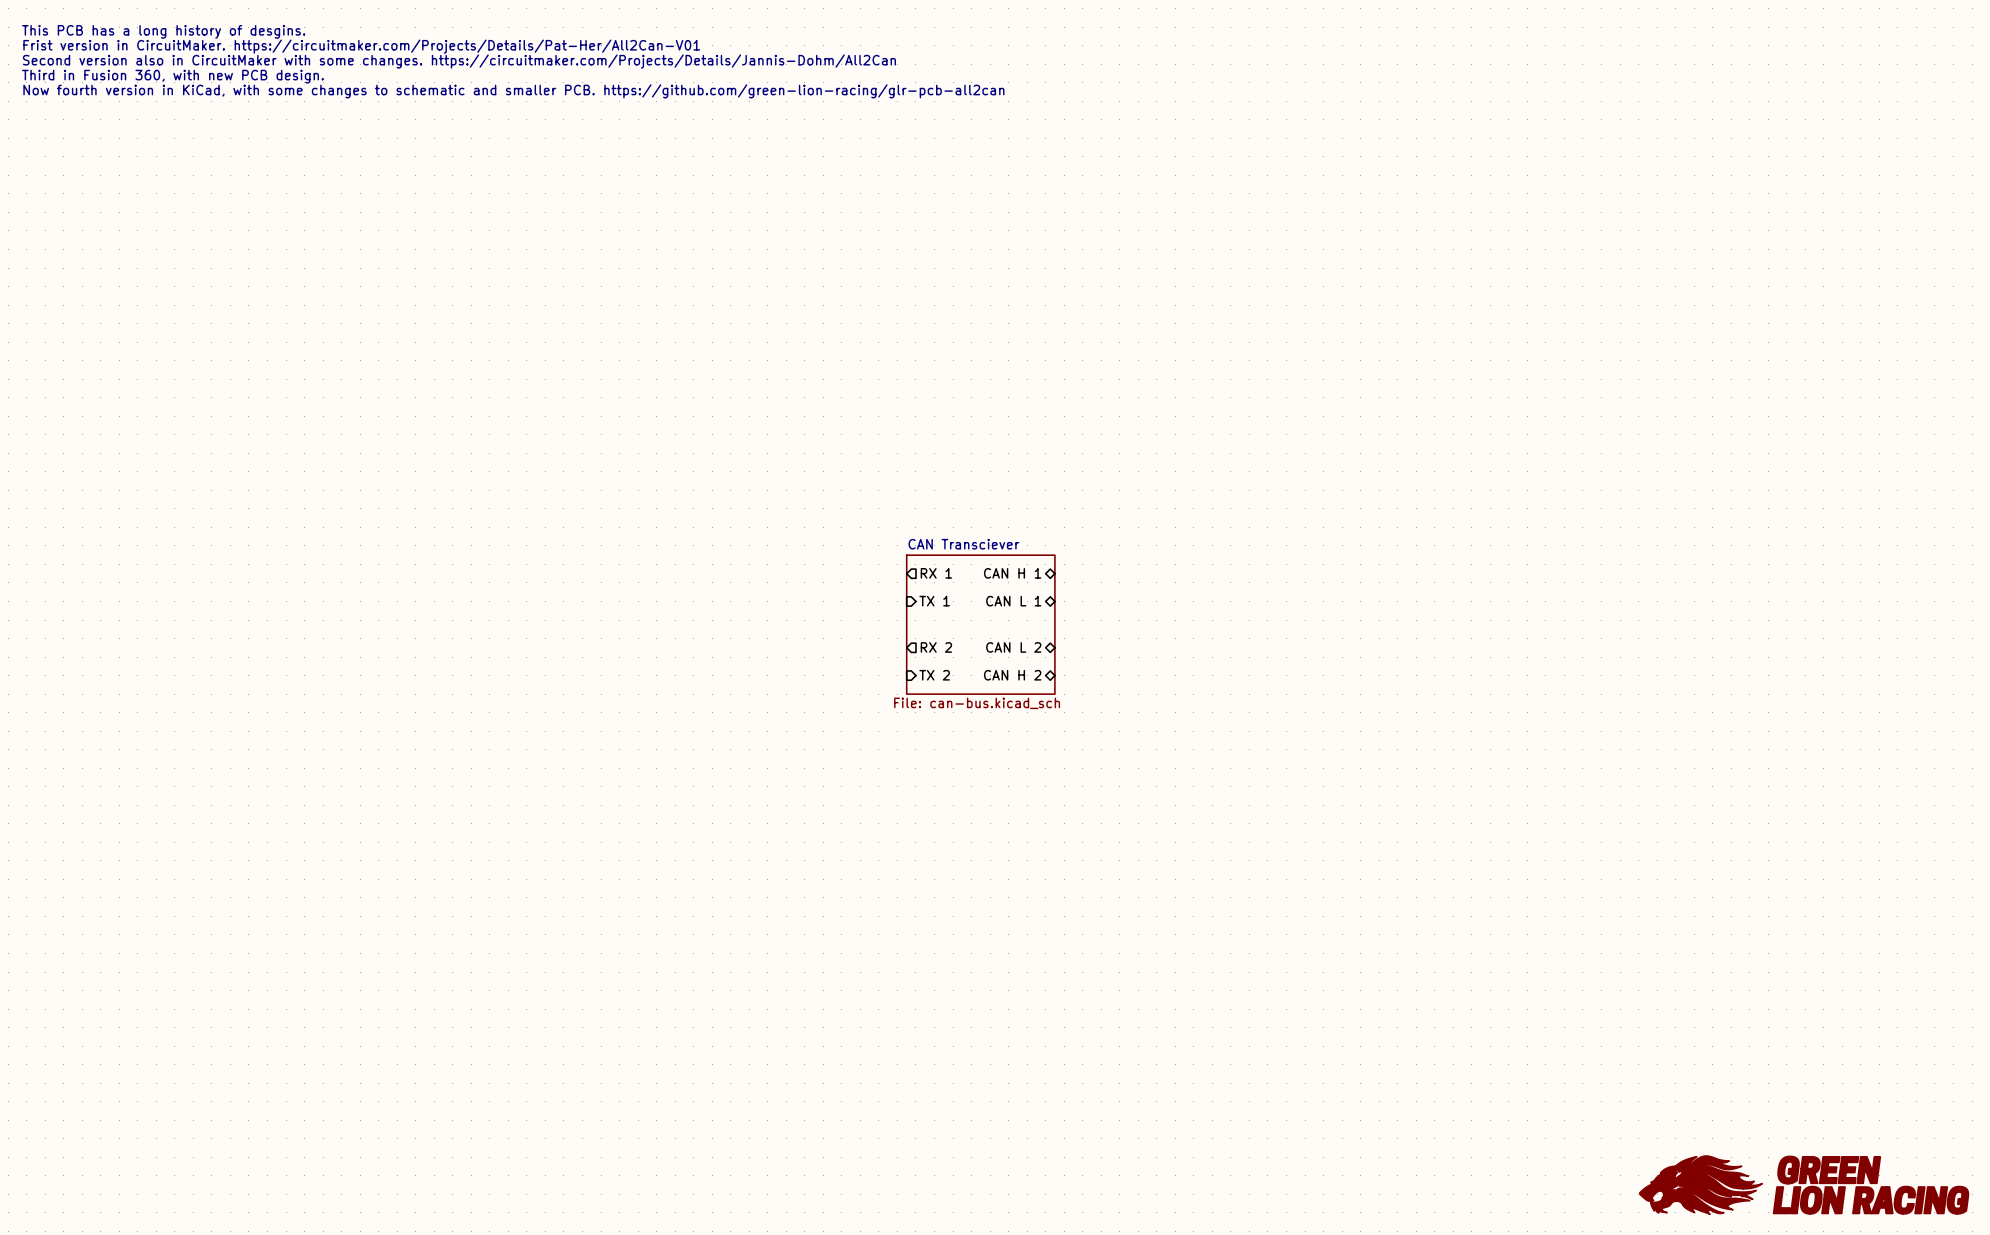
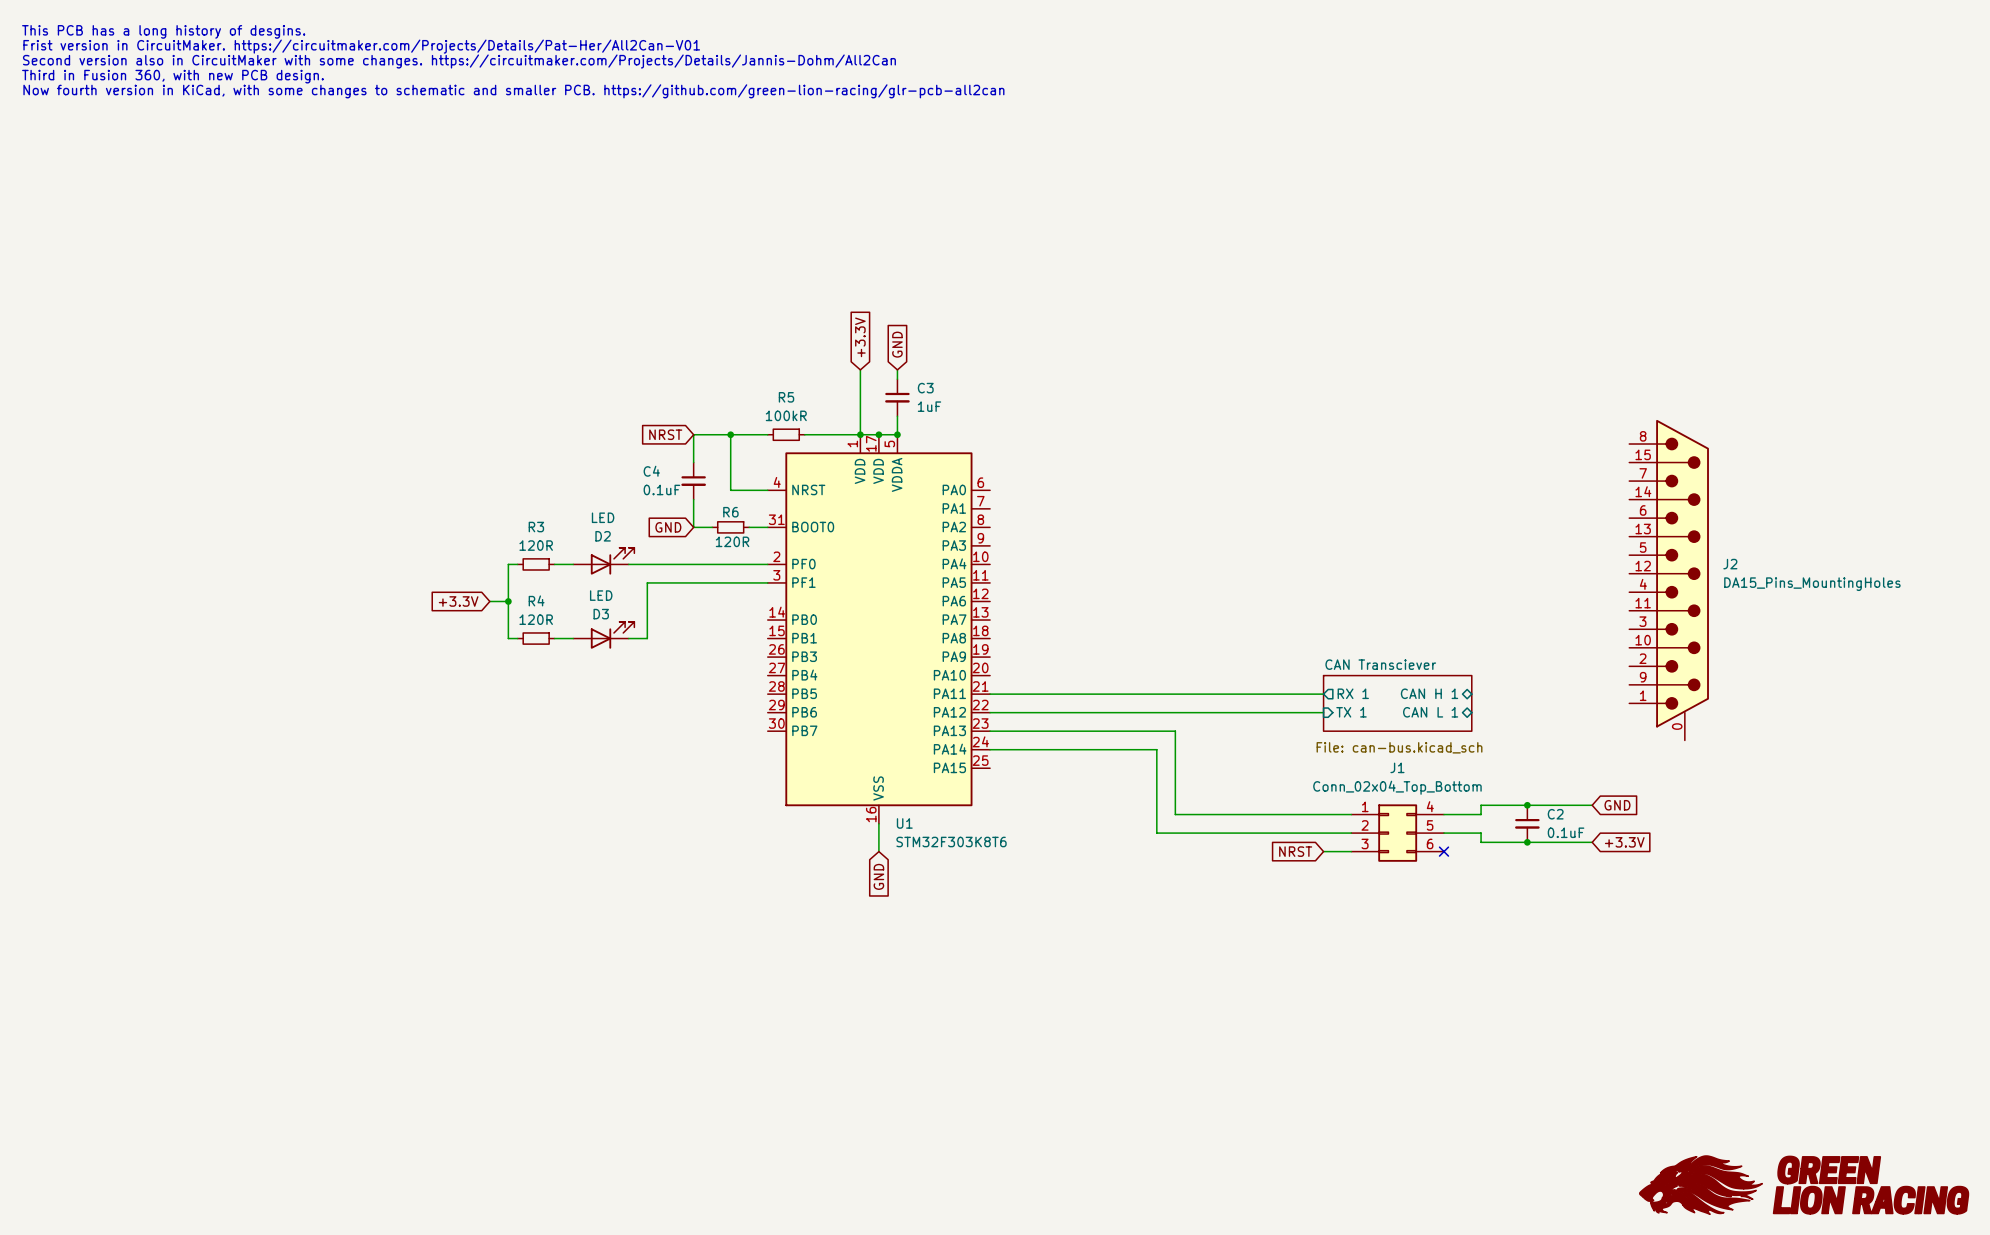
global label: none -> +3.3V (860, 337)
global label: none -> GND (897, 344)
wire: none -> (860, 369) (860, 434)
wire: none -> (897, 369) (897, 379)
C3: none -> 1uF (897, 397)
wire: none -> (897, 416) (897, 434) (804, 434)
global label: none -> NRST (665, 434)
wire: none -> (730, 434) (730, 490) (767, 490)
junction: none -> (730, 434)
wire: none -> (767, 434) (693, 434) (693, 462)
R5: none -> 100kR (786, 434)
junction: none -> (860, 434)
junction: none -> (878, 434)
junction: none -> (897, 434)
C4: none -> 0.1uF (693, 481)
wire: none -> (693, 499) (693, 527) (712, 527)
global label: none -> GND (668, 527)
R6: none -> 120R (730, 527)
wire: none -> (749, 527) (767, 527)
D2: none -> LED (603, 561)
wire: none -> (517, 564) (508, 564) (508, 638) (517, 638)
R3: none -> 120R (536, 564)
wire: none -> (554, 564) (573, 564)
wire: none -> (628, 564) (767, 564)
sheet pin: RX 1 (936, 573) -> none
sheet pin: CAN H 1 (1012, 573) -> none
J2: none -> DA15_Pins_MountingHoles (1669, 580)
wire: none -> (767, 582) (647, 582) (647, 638) (628, 638)
global label: none -> +3.3V (458, 601)
wire: none -> (489, 601) (508, 601)
junction: none -> (508, 601)
sheet pin: TX 1 (934, 601) -> none
sheet pin: CAN L 1 (1013, 601) -> none
sheet CAN Transciever: File: can-bus.kicad_sch (980, 624) -> none
U1: none -> STM32F303K8T6 (878, 629)
D3: none -> LED (603, 635)
R4: none -> 120R (536, 638)
wire: none -> (554, 638) (573, 638)
sheet pin: RX 2 (936, 647) -> none
sheet pin: CAN L 2 (1013, 647) -> none
sheet pin: TX 2 (934, 675) -> none
sheet pin: CAN H 2 (1012, 675) -> none
sheet pin: none -> RX 1 (1353, 693)
sheet pin: none -> CAN H 1 (1429, 693)
wire: none -> (990, 694) (1323, 694)
sheet CAN Transciever: none -> File: can-bus.kicad_sch (1397, 703)
wire: none -> (990, 712) (1323, 712)
sheet pin: none -> TX 1 (1351, 712)
sheet pin: none -> CAN L 1 (1430, 712)
wire: none -> (990, 731) (1175, 731) (1175, 814) (1351, 814)
wire: none -> (990, 749) (1156, 749) (1156, 833) (1351, 833)
junction: none -> (1527, 805)
wire: none -> (1592, 805) (1481, 805) (1481, 814) (1443, 814)
global label: none -> GND (1617, 805)
wire: none -> (878, 823) (878, 851)
C2: none -> 0.1uF (1527, 823)
J1: none -> Conn_02x04_Top_Bottom (1397, 833)
wire: none -> (1443, 833) (1481, 833) (1481, 842) (1592, 842)
junction: none -> (1527, 842)
global label: none -> +3.3V (1624, 842)
global label: none -> NRST (1295, 851)
wire: none -> (1323, 851) (1351, 851)
no-connect mark: none -> (1443, 851)
global label: none -> GND (878, 876)

